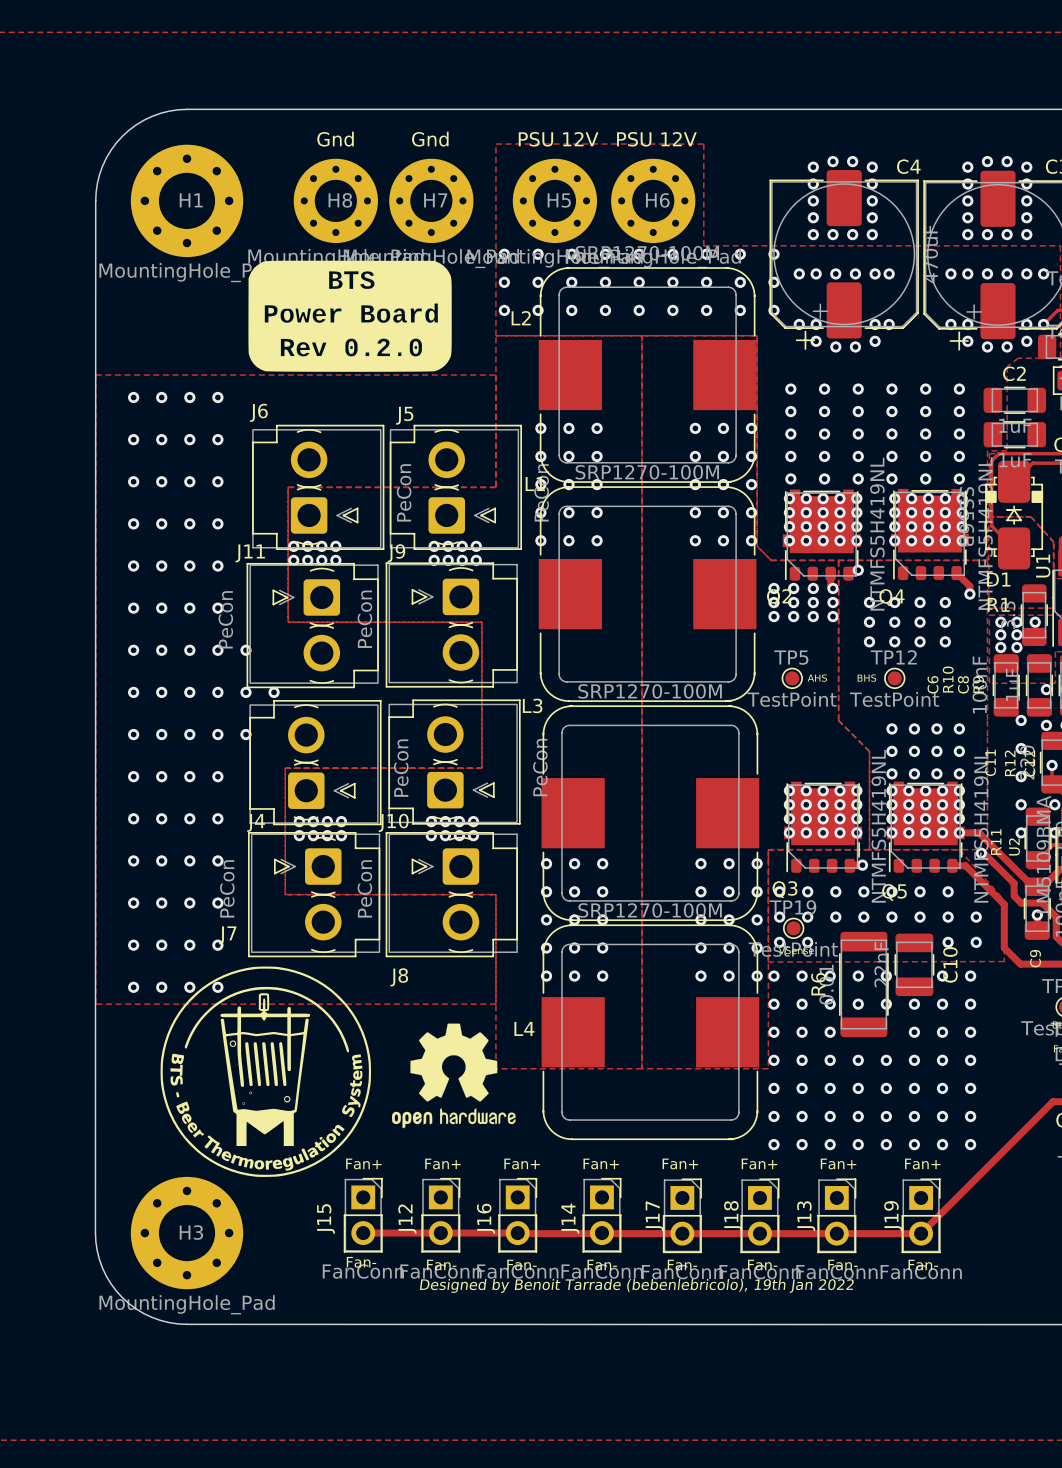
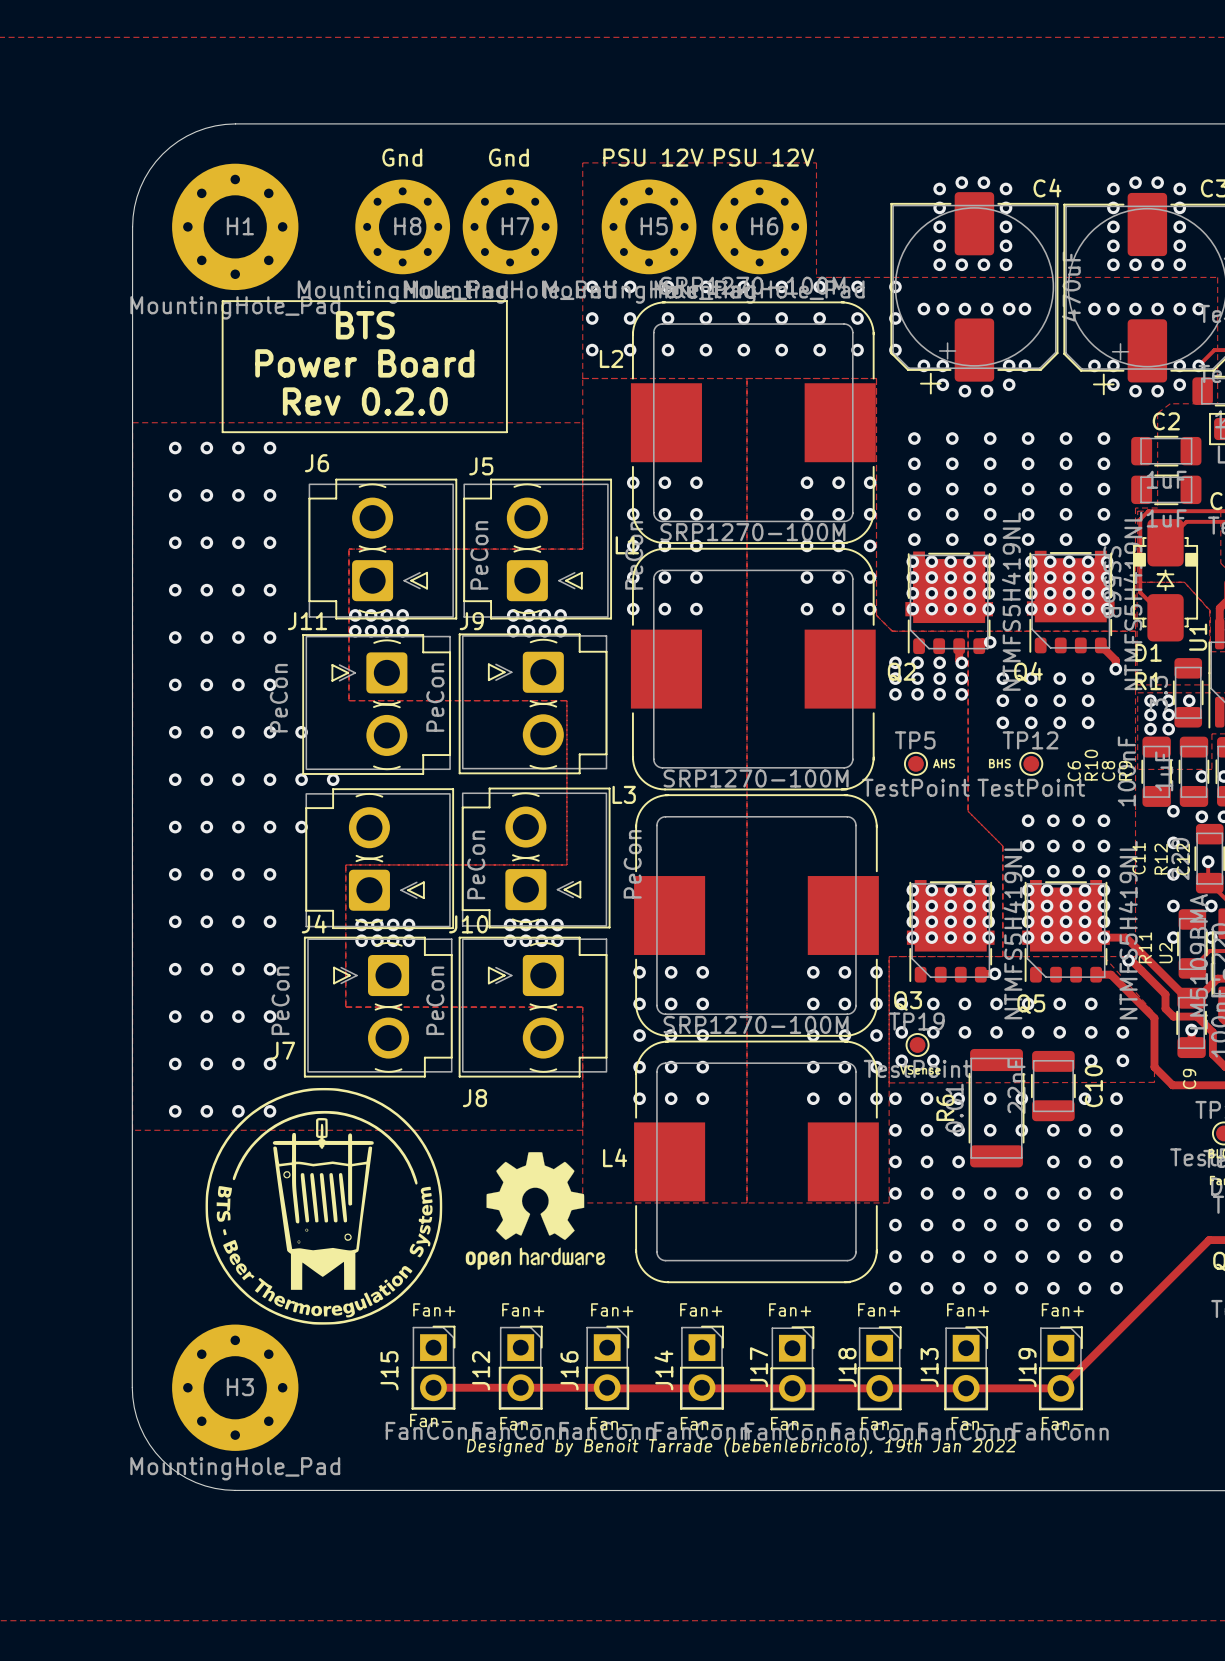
drawing: [248, 260, 452, 372] -> none
line: none -> (222, 301) (506, 301) (506, 432) (222, 432) (222, 301)
text: none -> BTS (365, 325)
text: none -> Power Board (364, 363)
text: none -> Rev 0.2.0 (365, 401)

